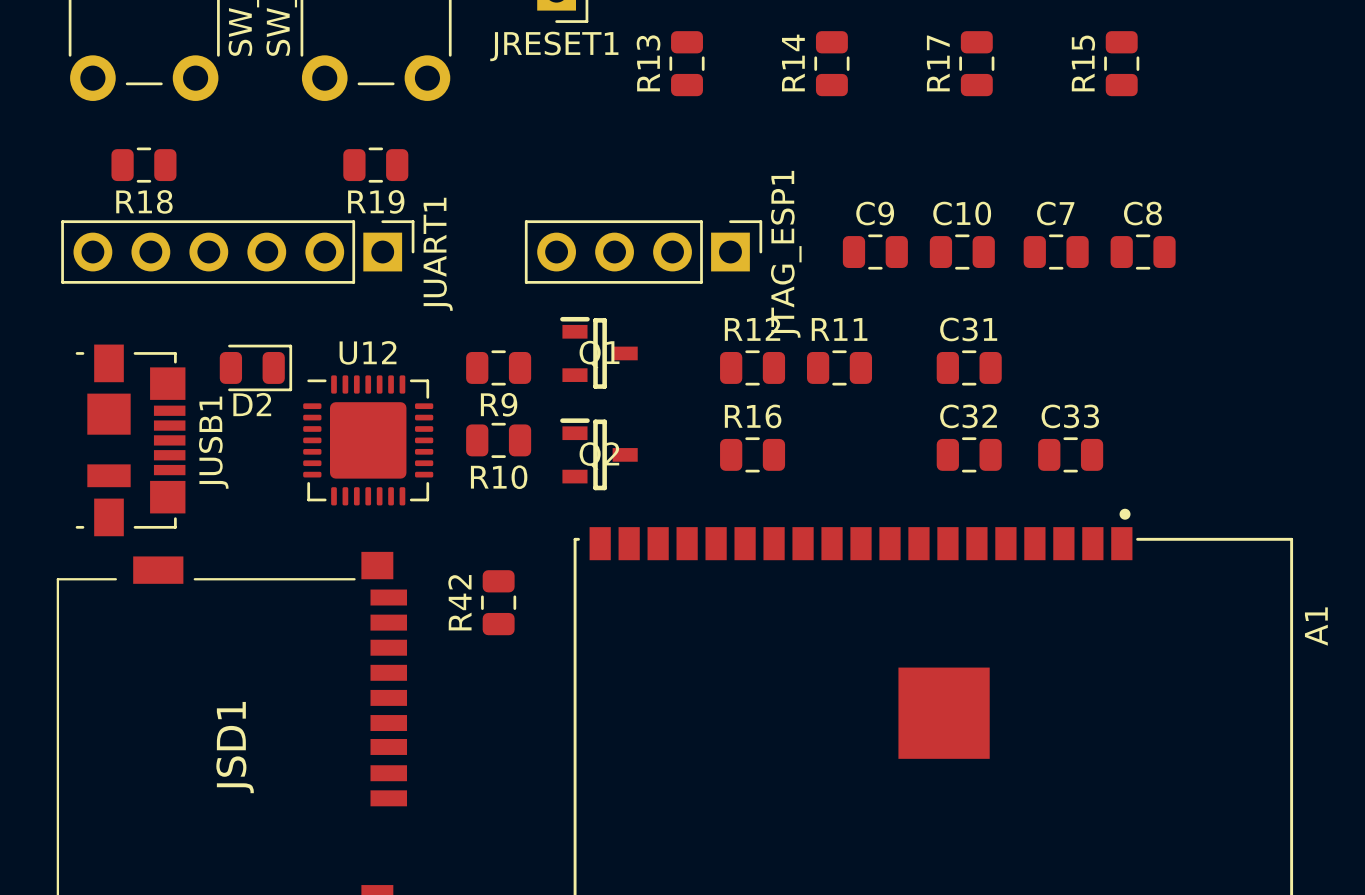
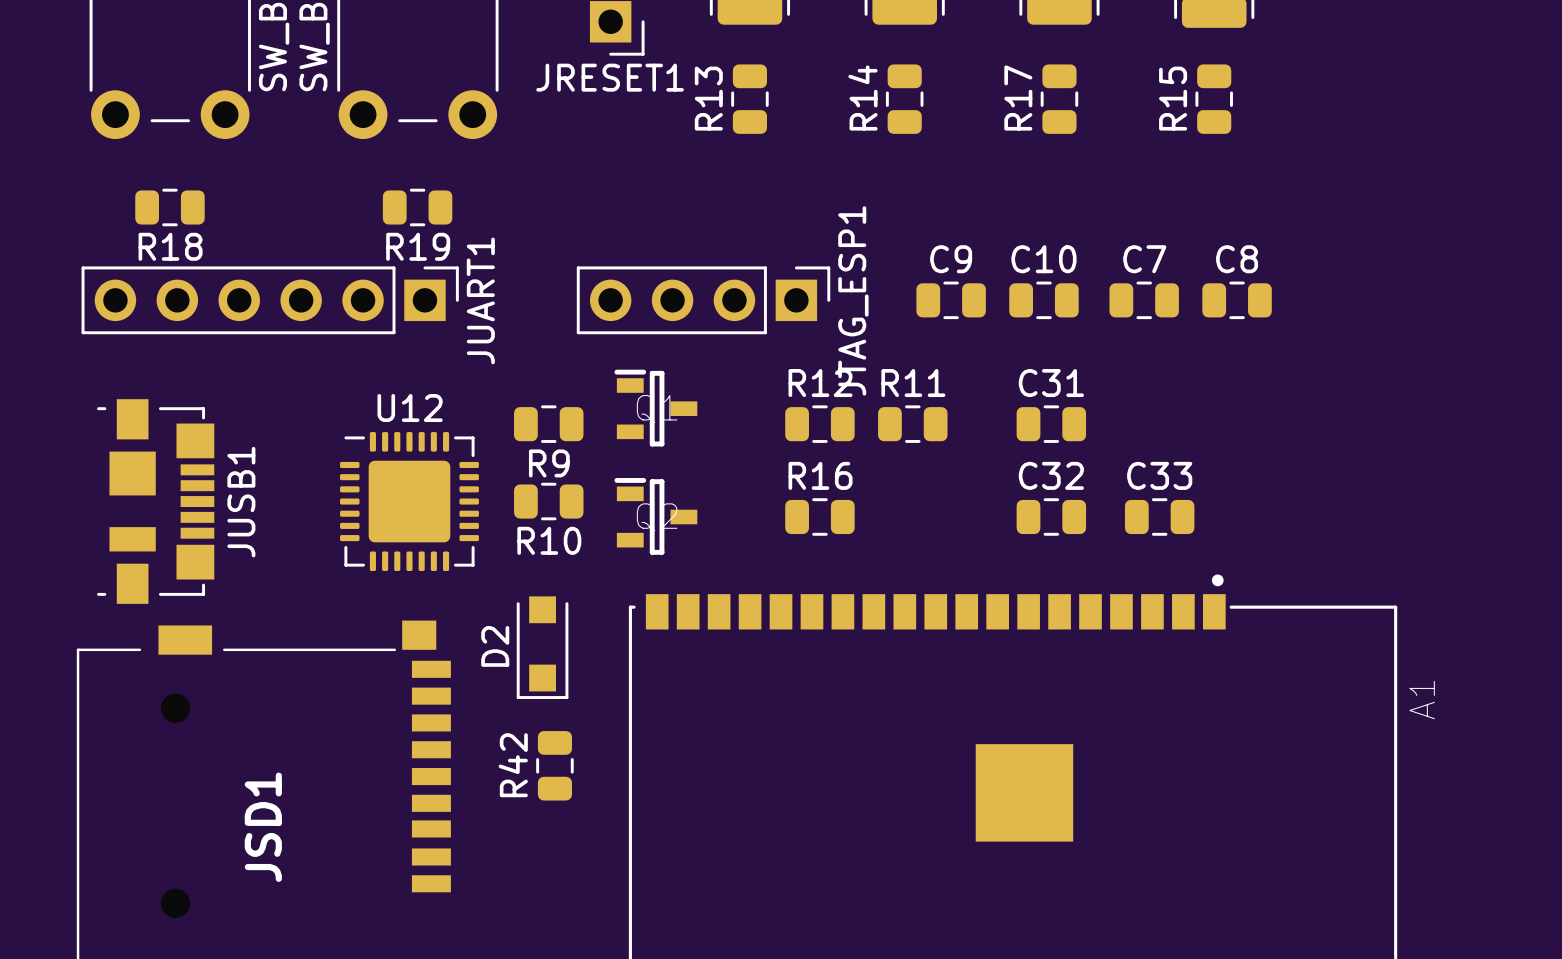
D2 footprint: [219, 344, 293, 392] -> [516, 596, 569, 699]
D2 name position: D2 (252, 404) -> D2 (495, 646)
R42 position: (498, 602) -> (554, 765)

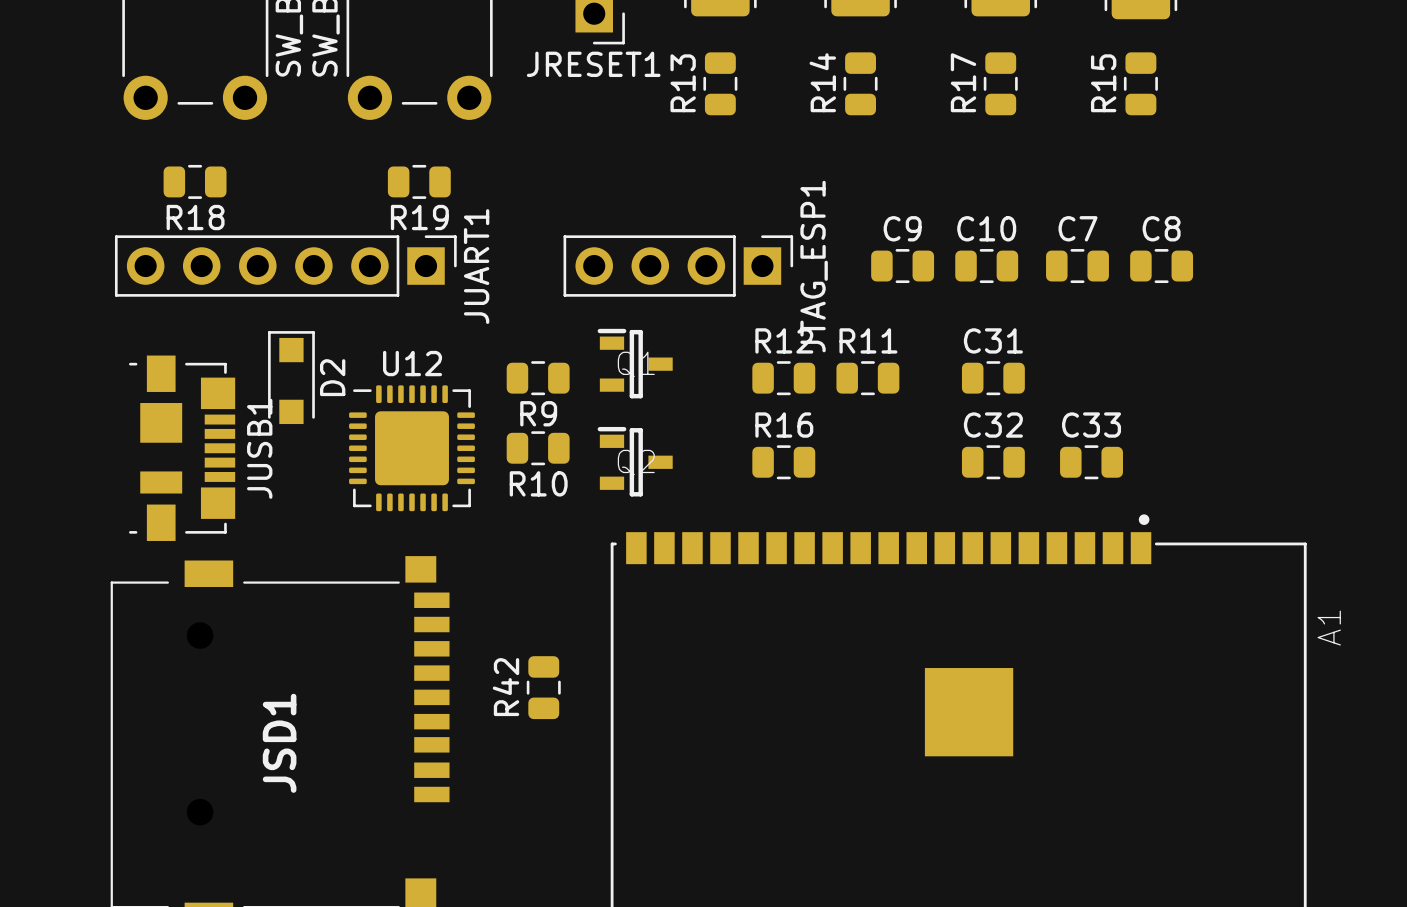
D2 rotation: 0° (542, 647) -> 180° (291, 377)
D2 position: (542, 647) -> (291, 377)

